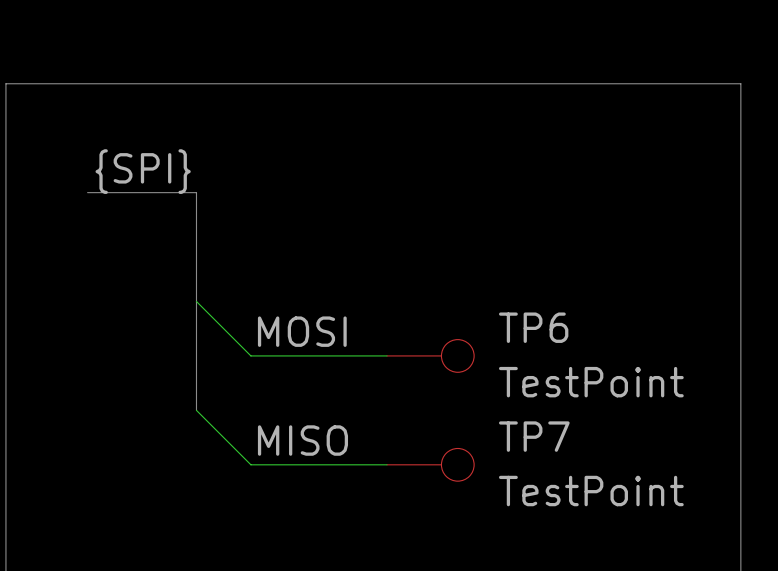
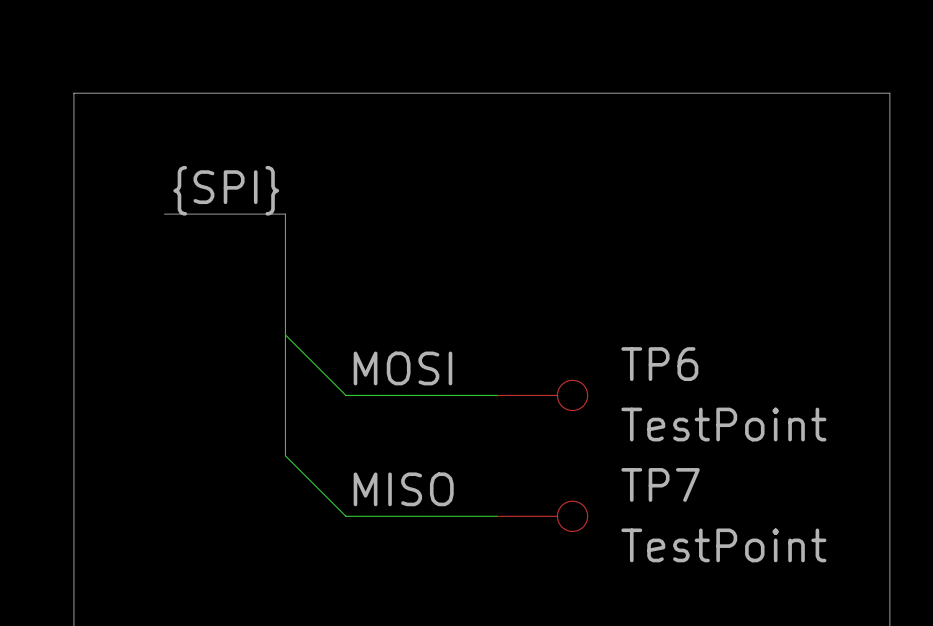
TP6 symbol: [387, 339, 475, 373] -> [497, 380, 588, 411]
TP7 symbol: [387, 448, 475, 482] -> [497, 501, 588, 532]

